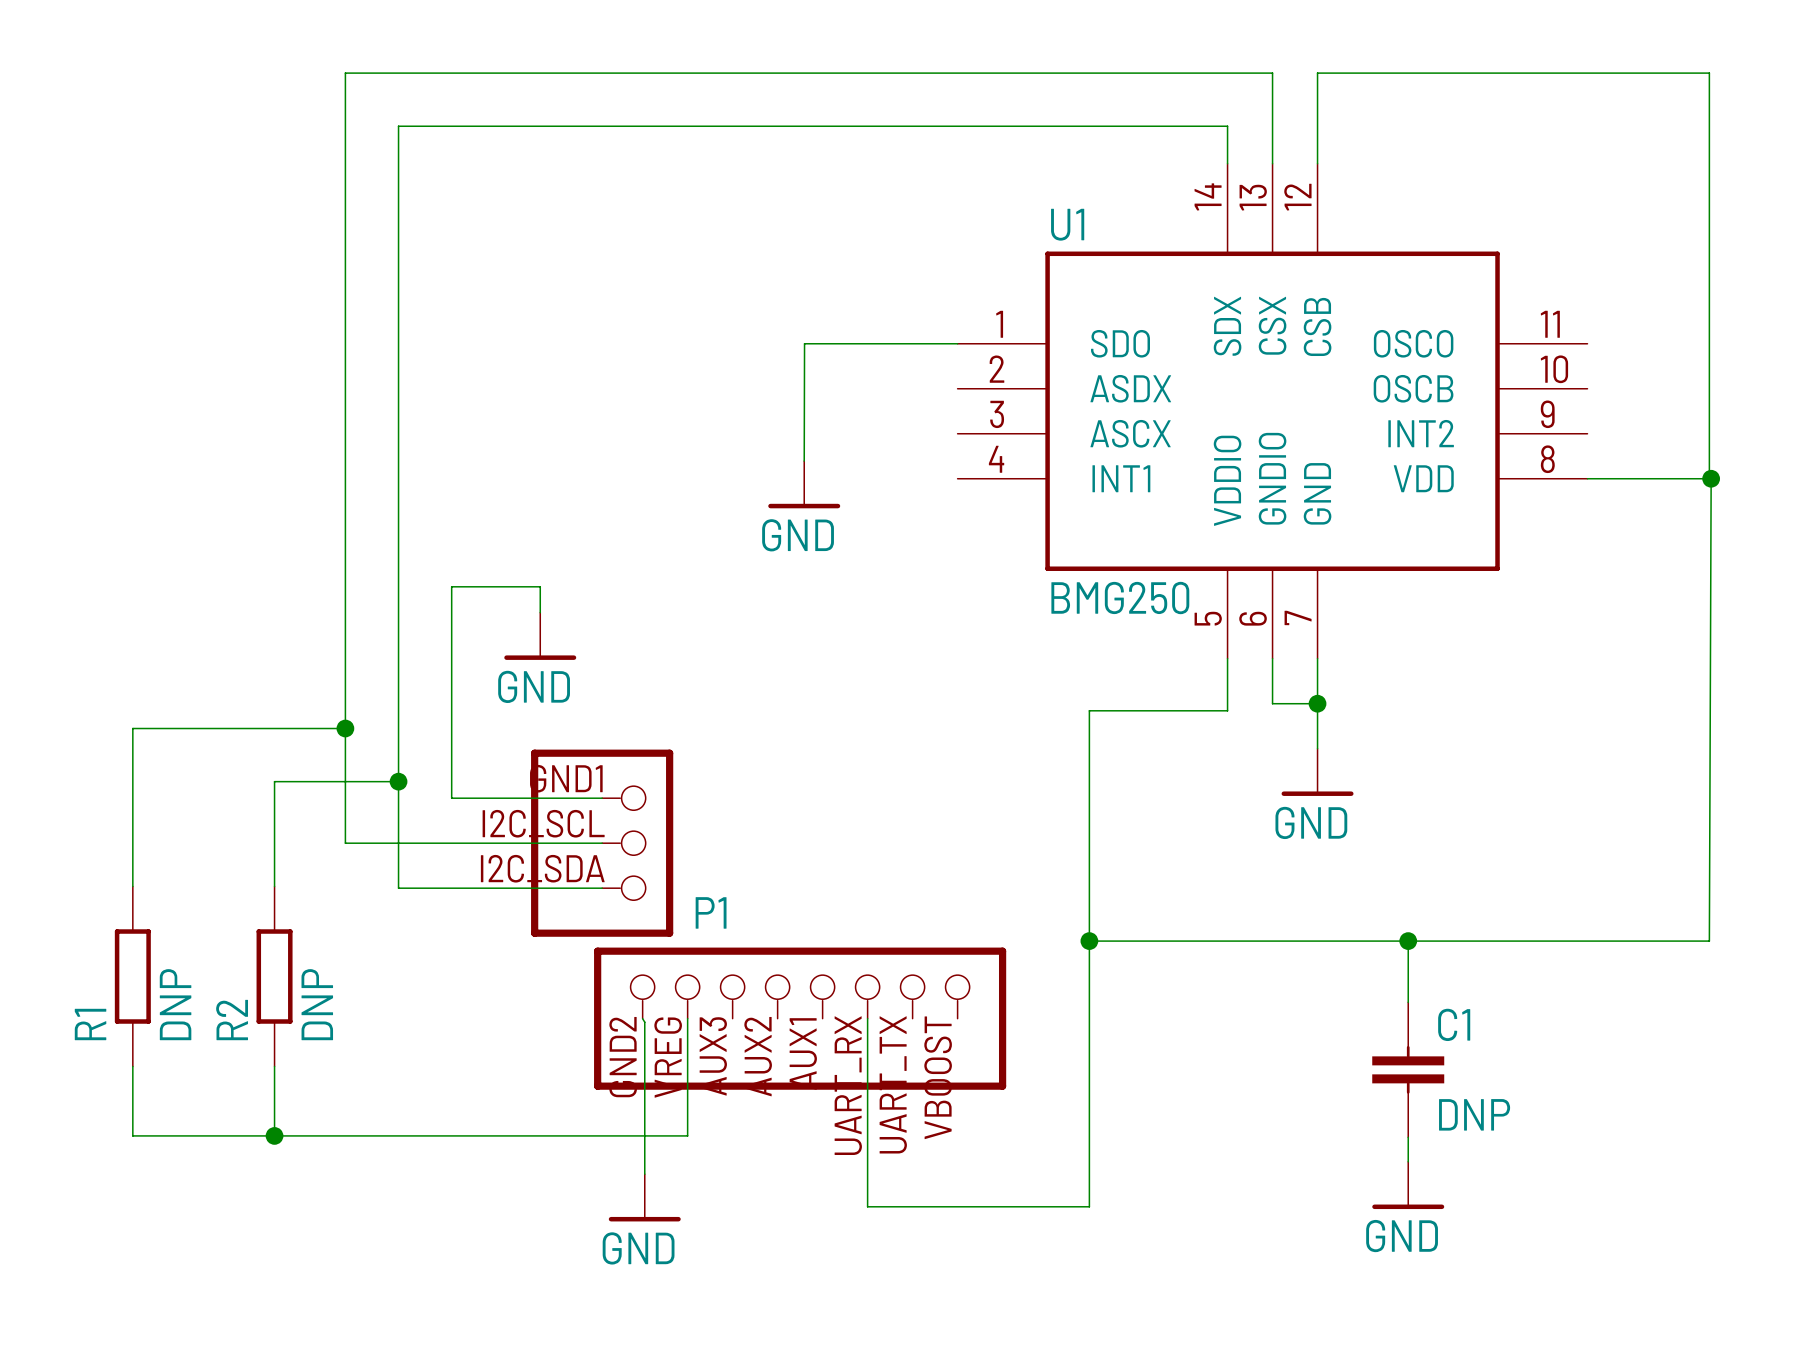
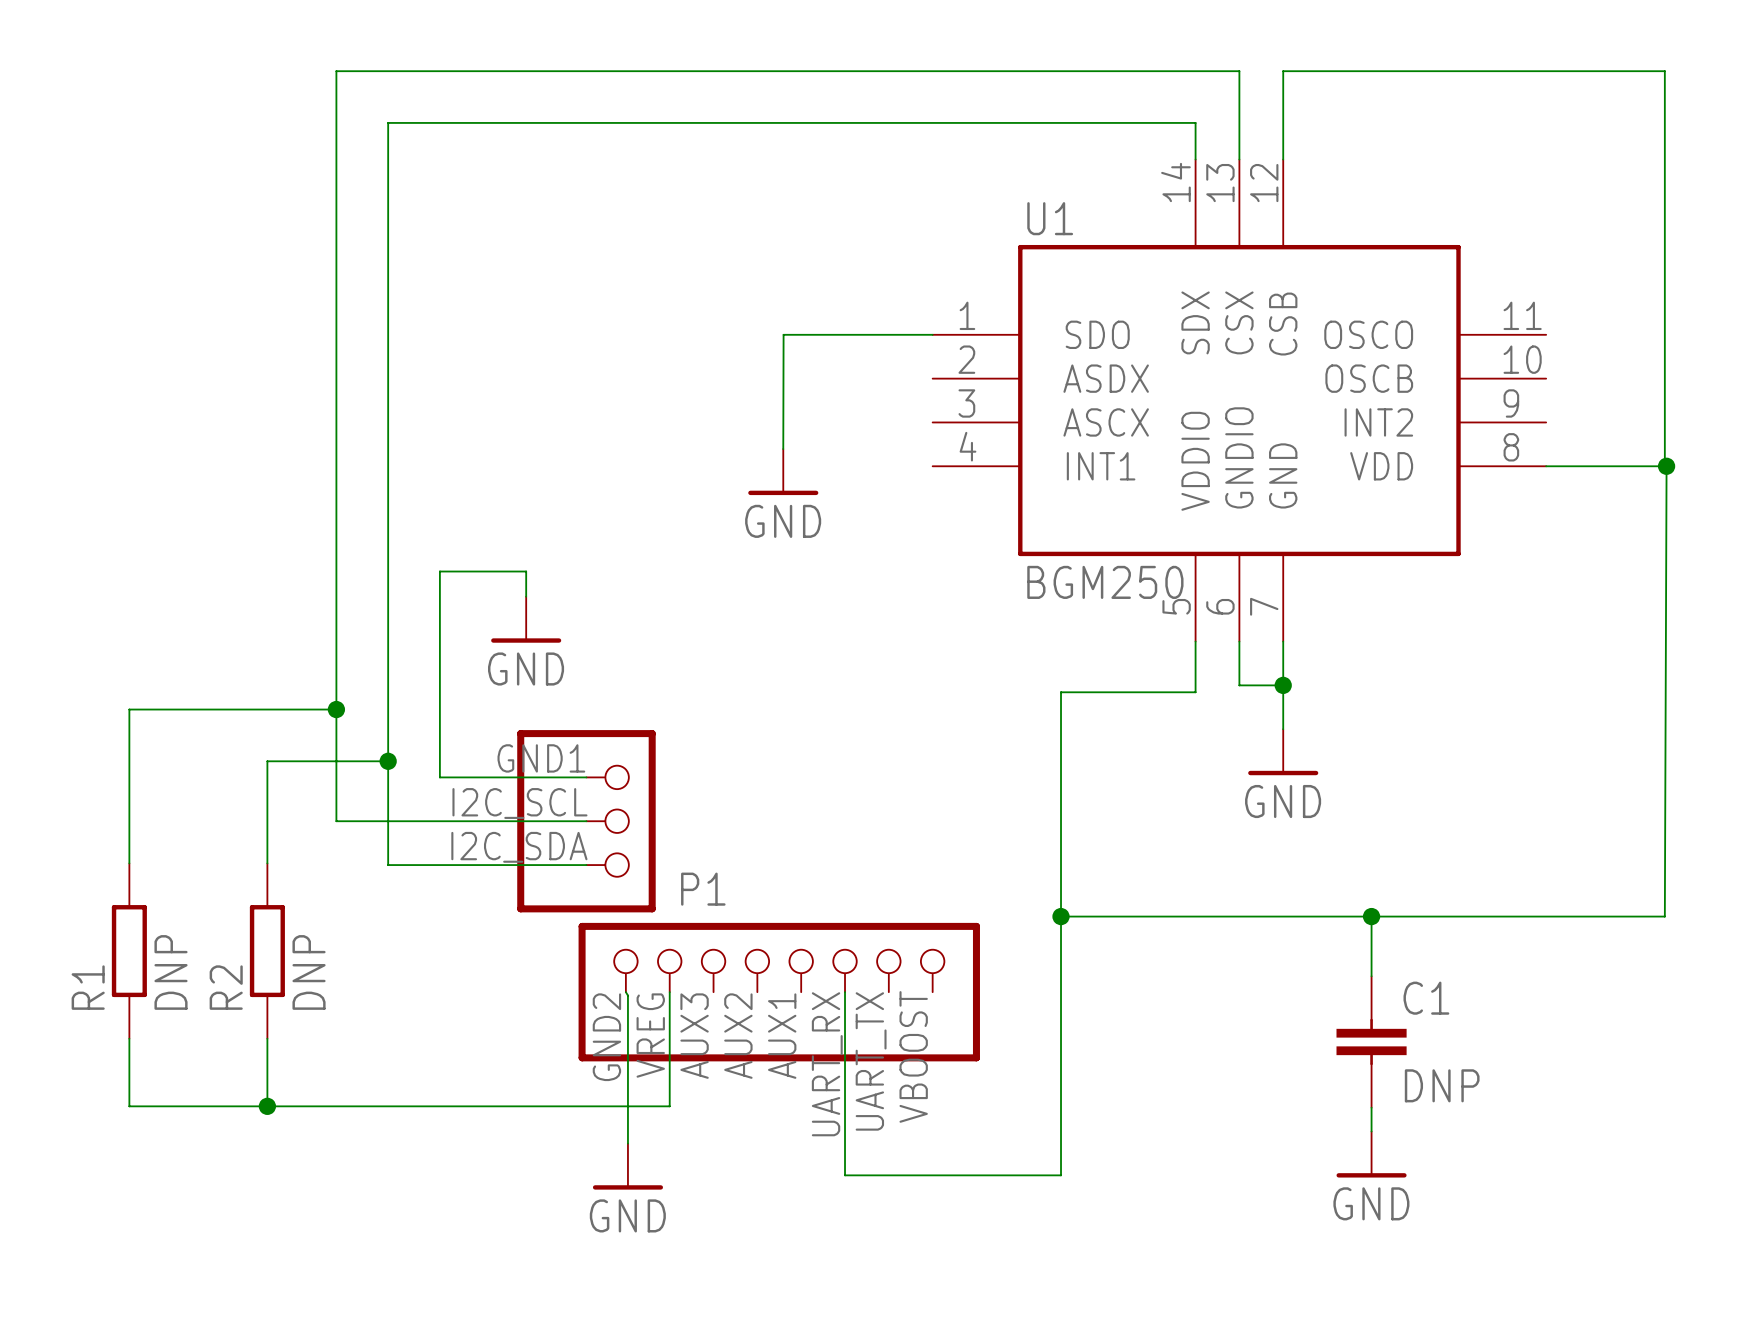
U1 value: BMG250 (1120, 598) -> BGM250 (1105, 582)

